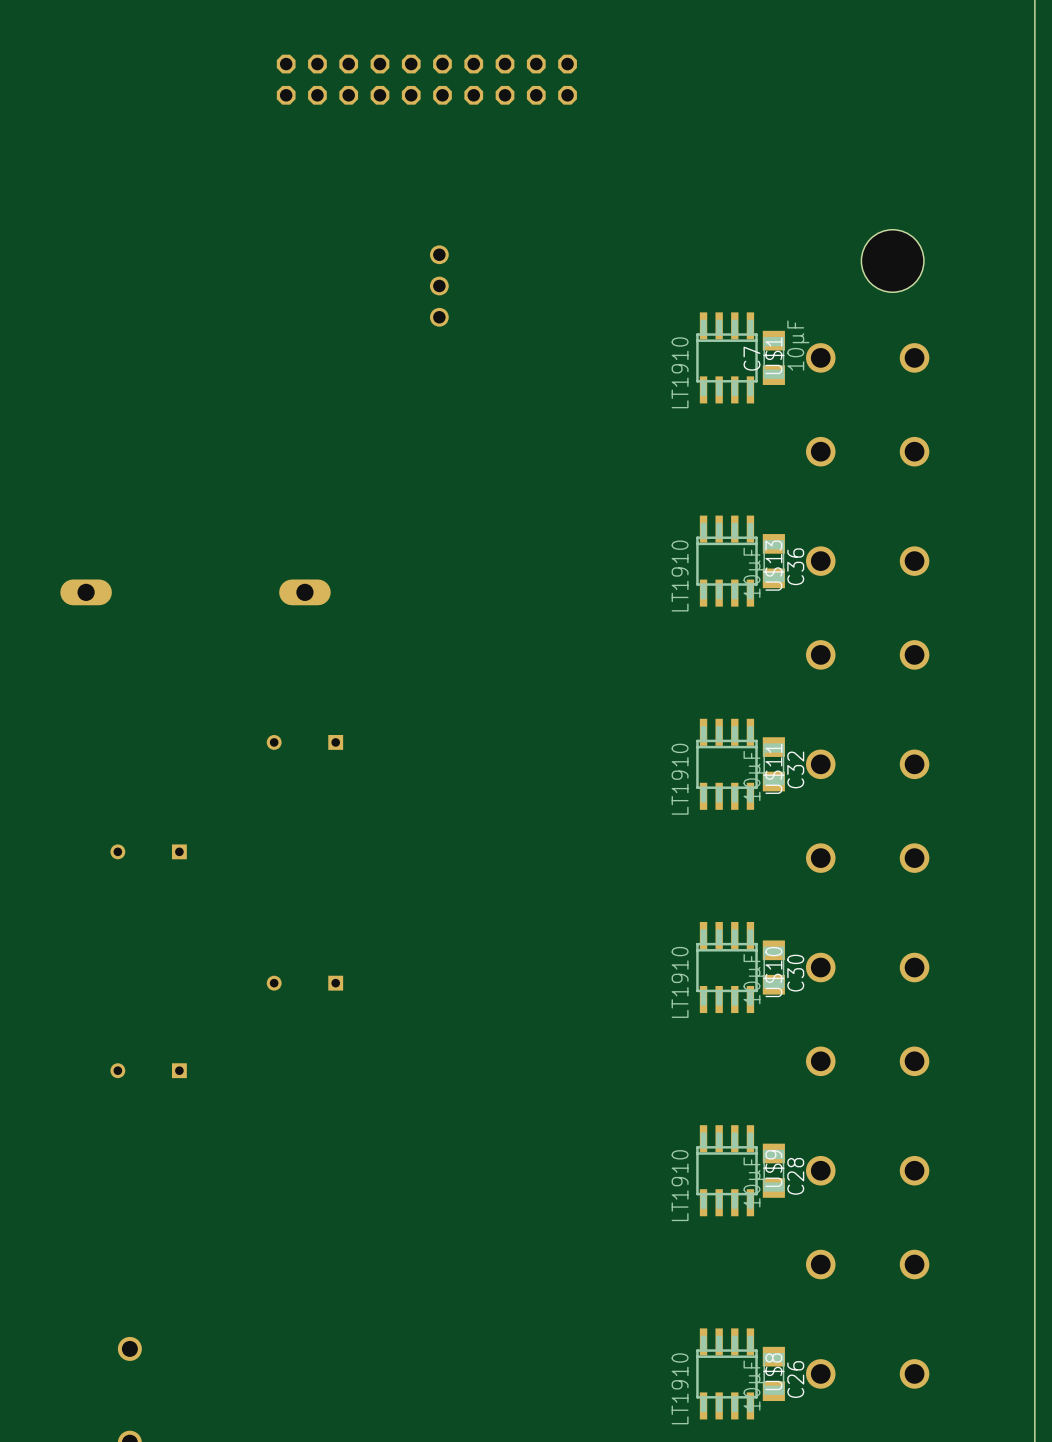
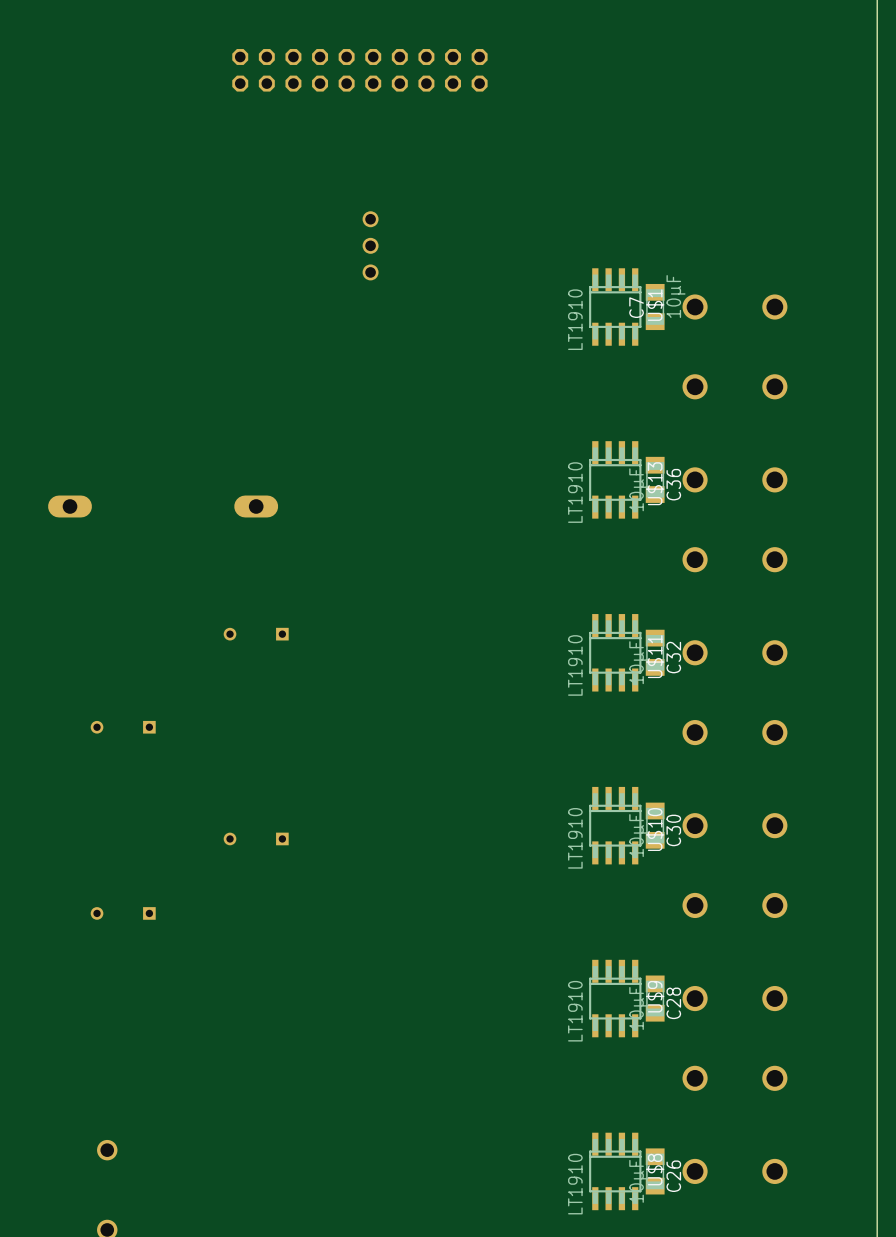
hole: (892, 260) -> none

